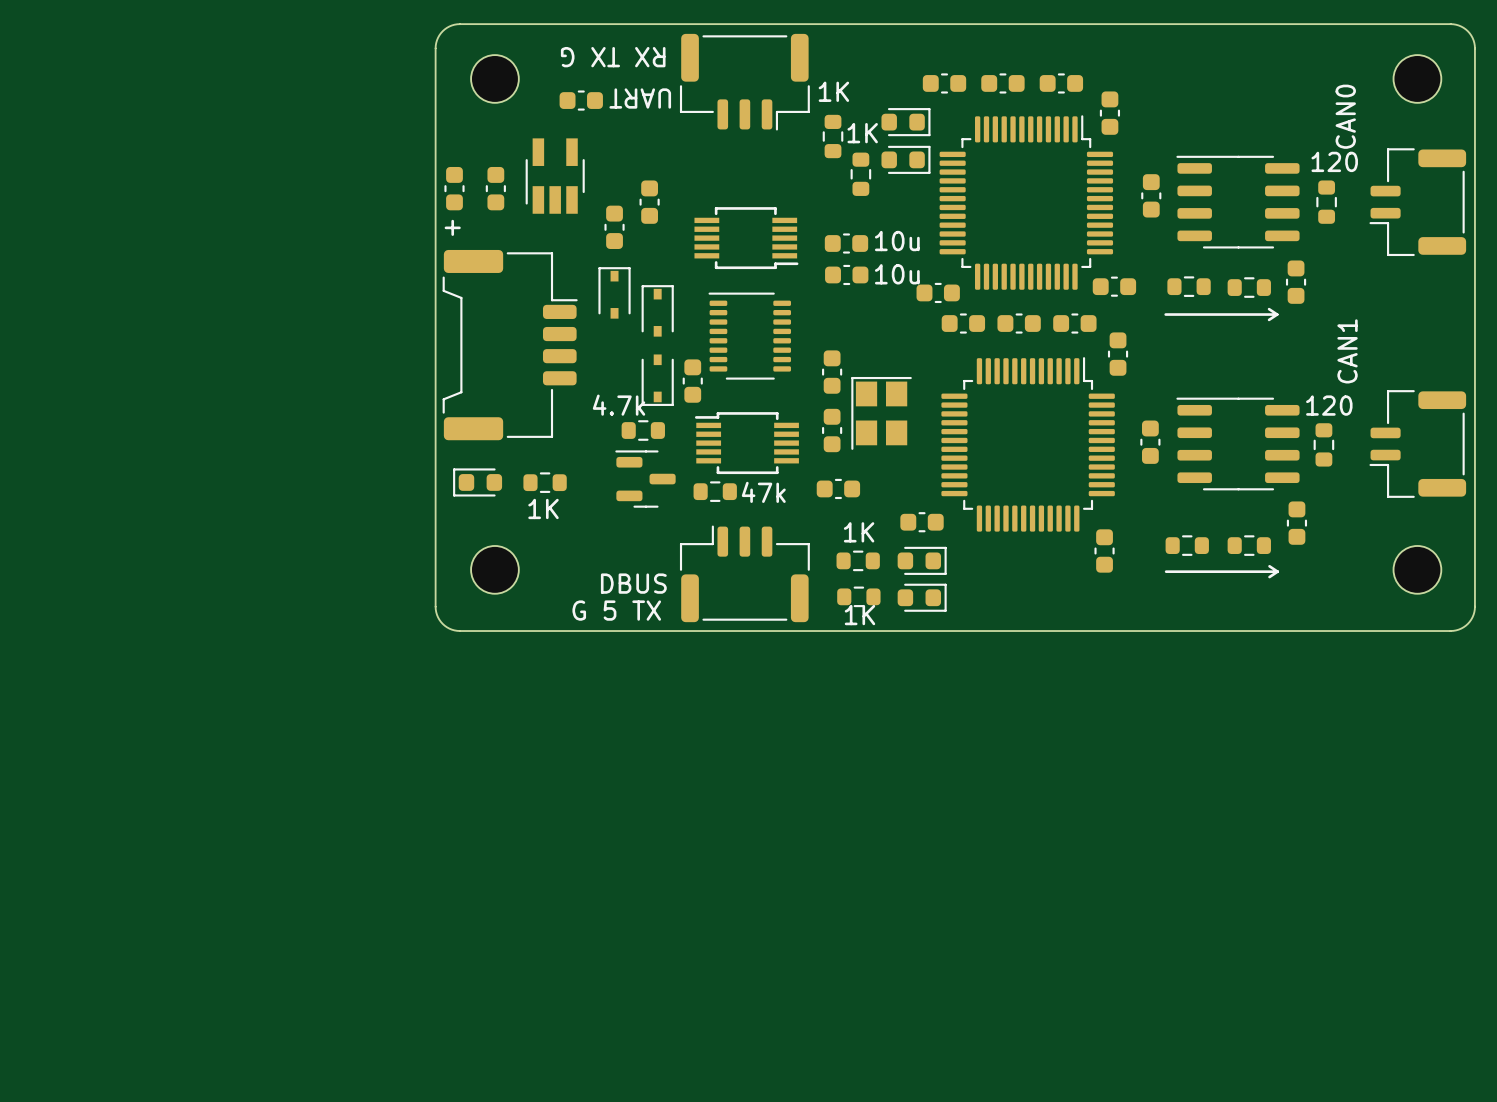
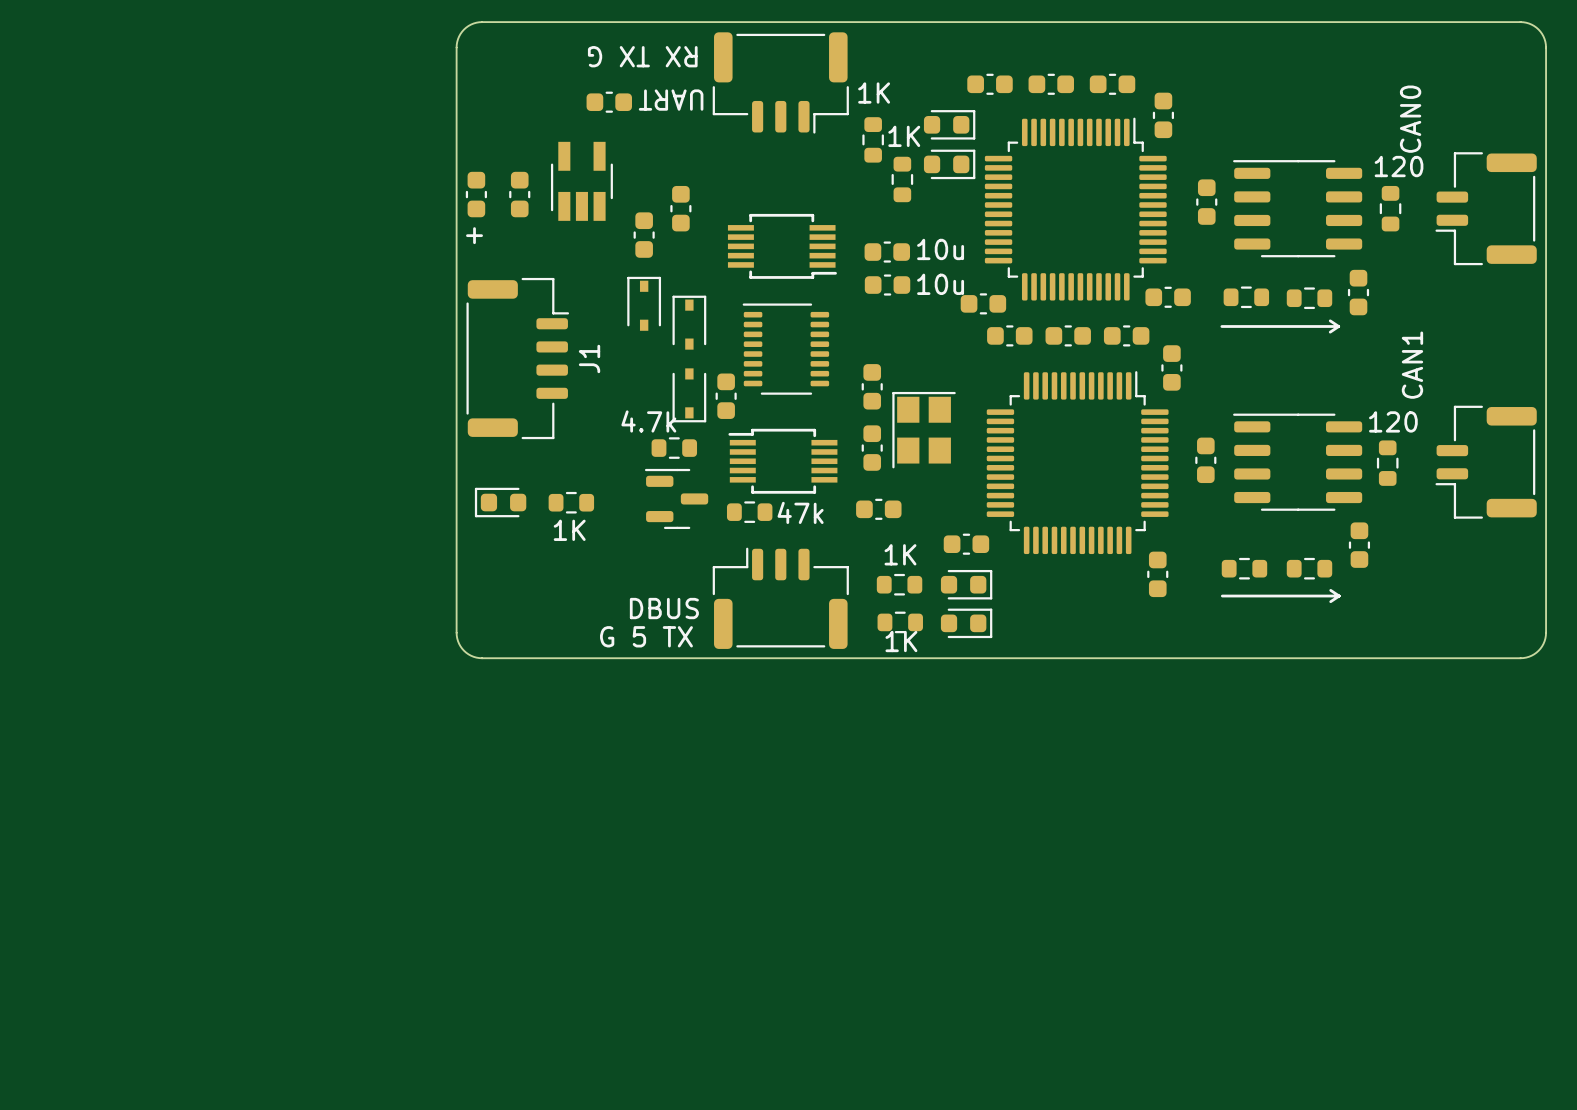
part: (494, 78) -> none
part: (1417, 78) -> none
J1: none -> (517, 358)
part: (510, 345) -> none
part: (494, 569) -> none
part: (1417, 569) -> none

